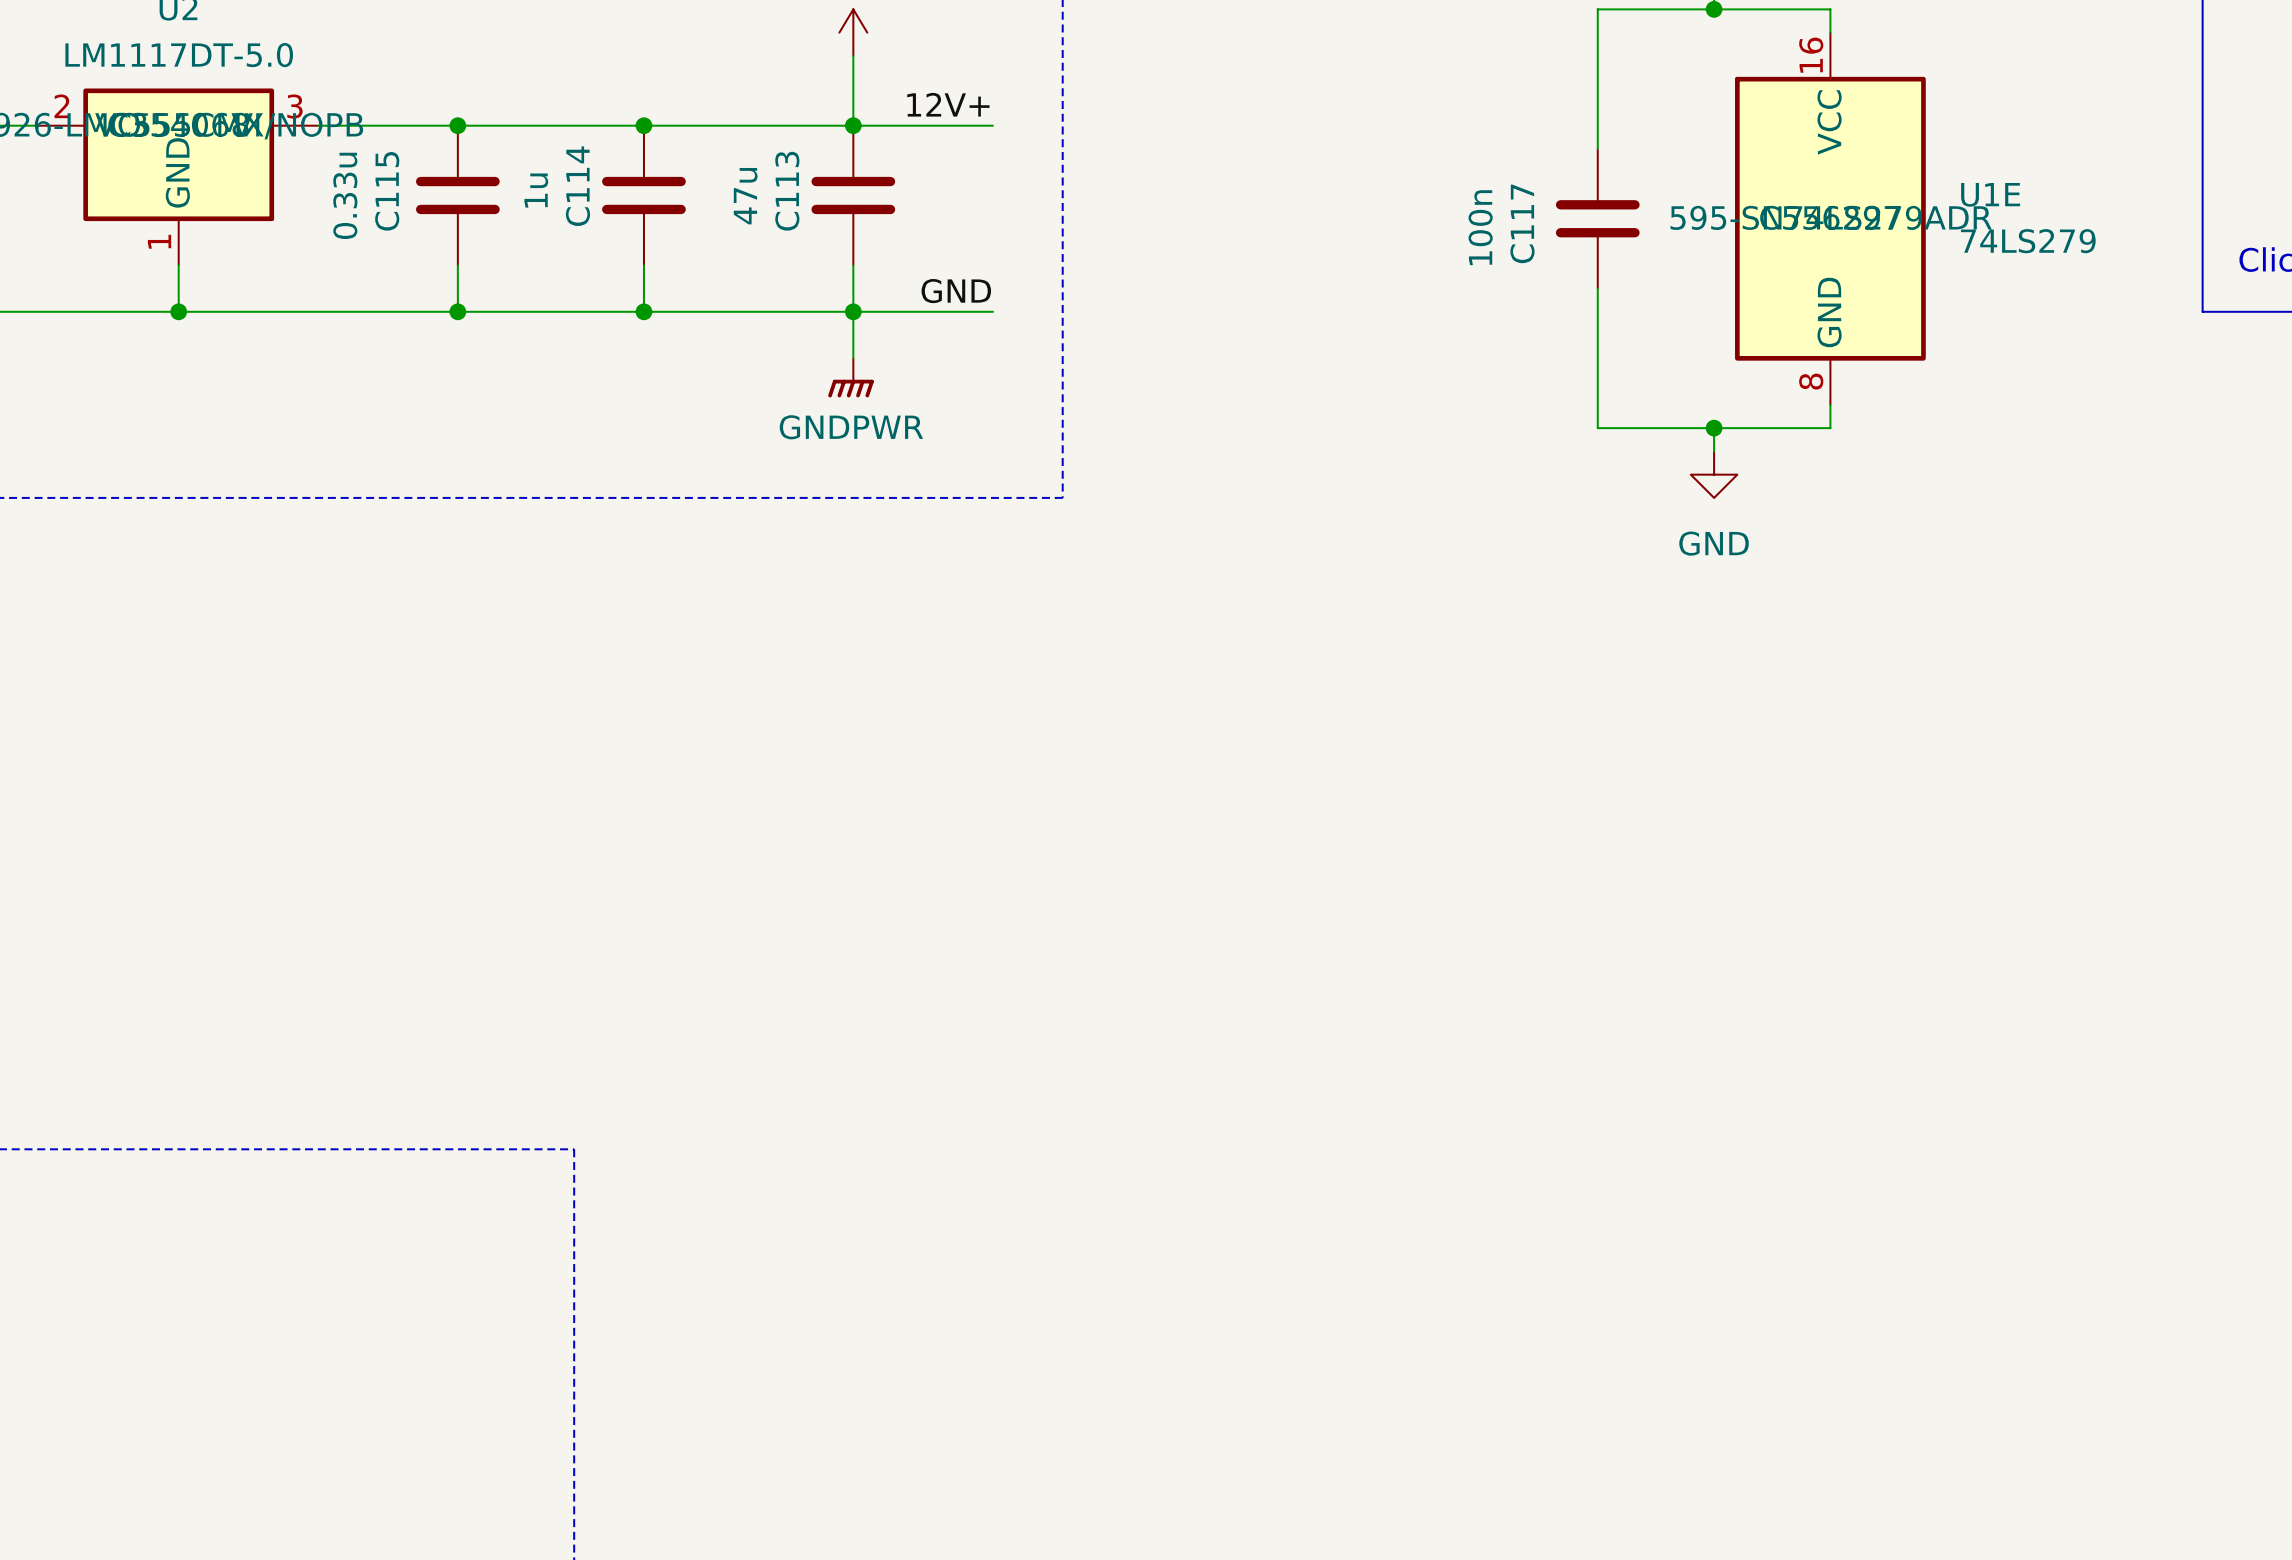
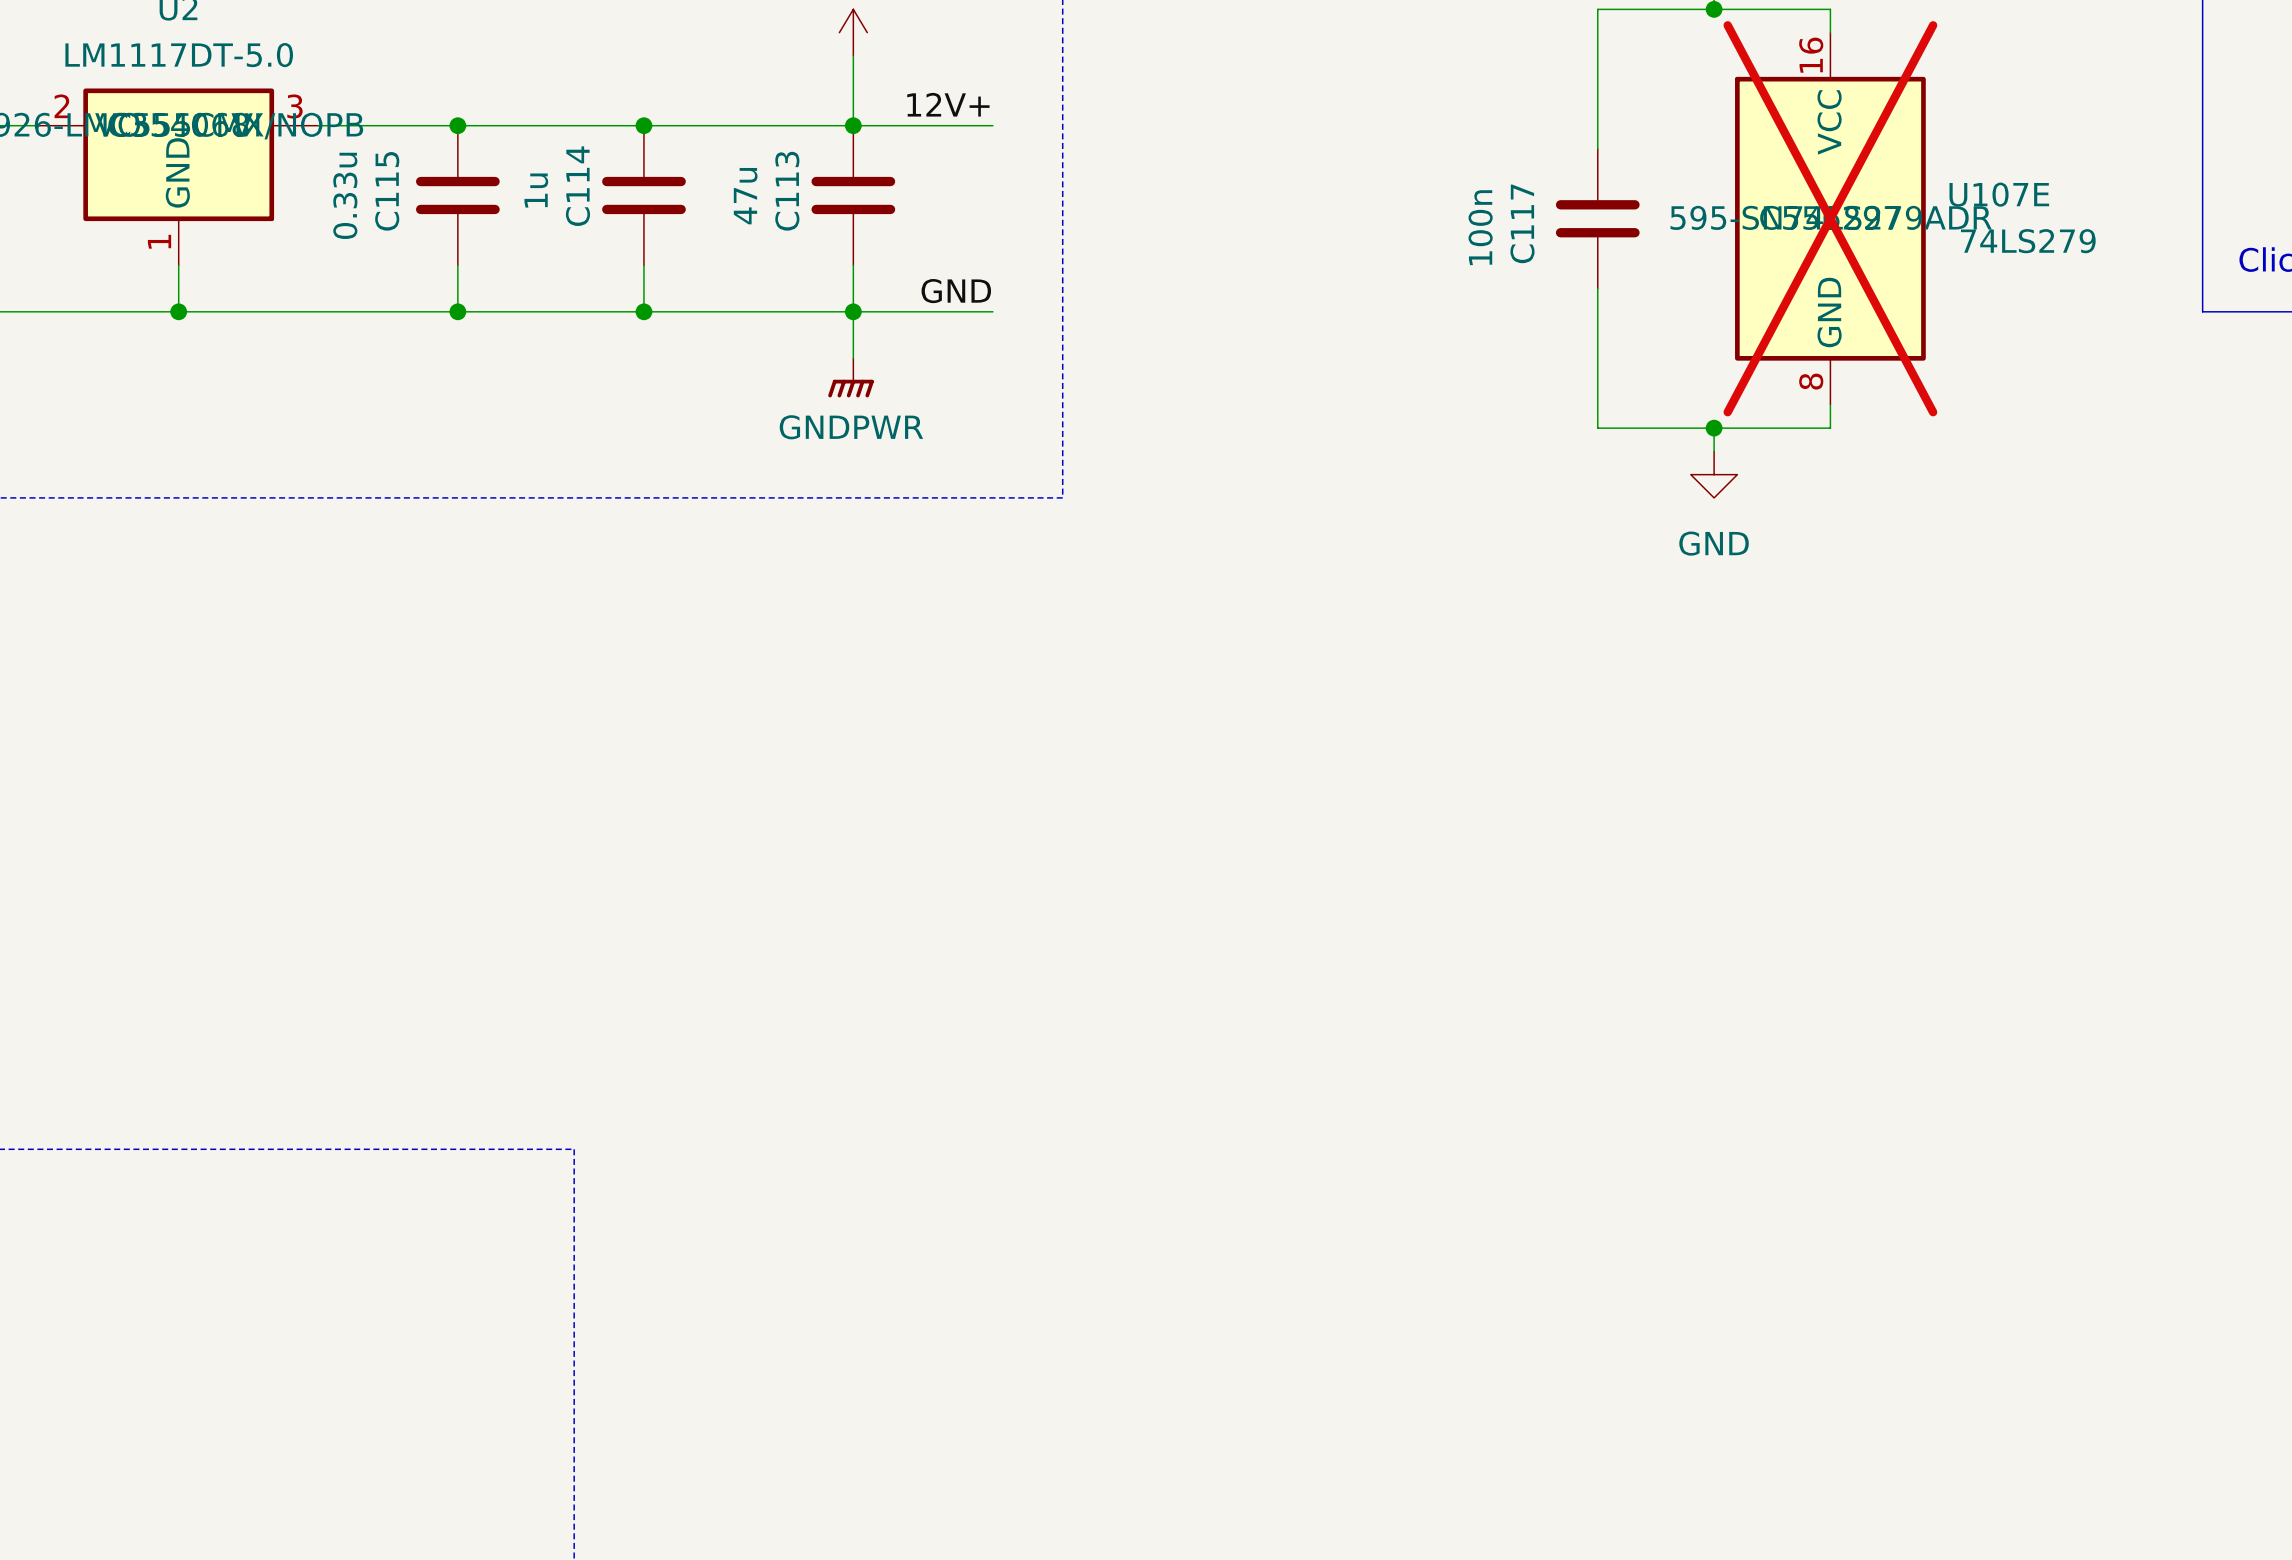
U1E name: U1E (1990, 194) -> U107E (1999, 194)
U1E do-not-place cross: none -> (1830, 218)

